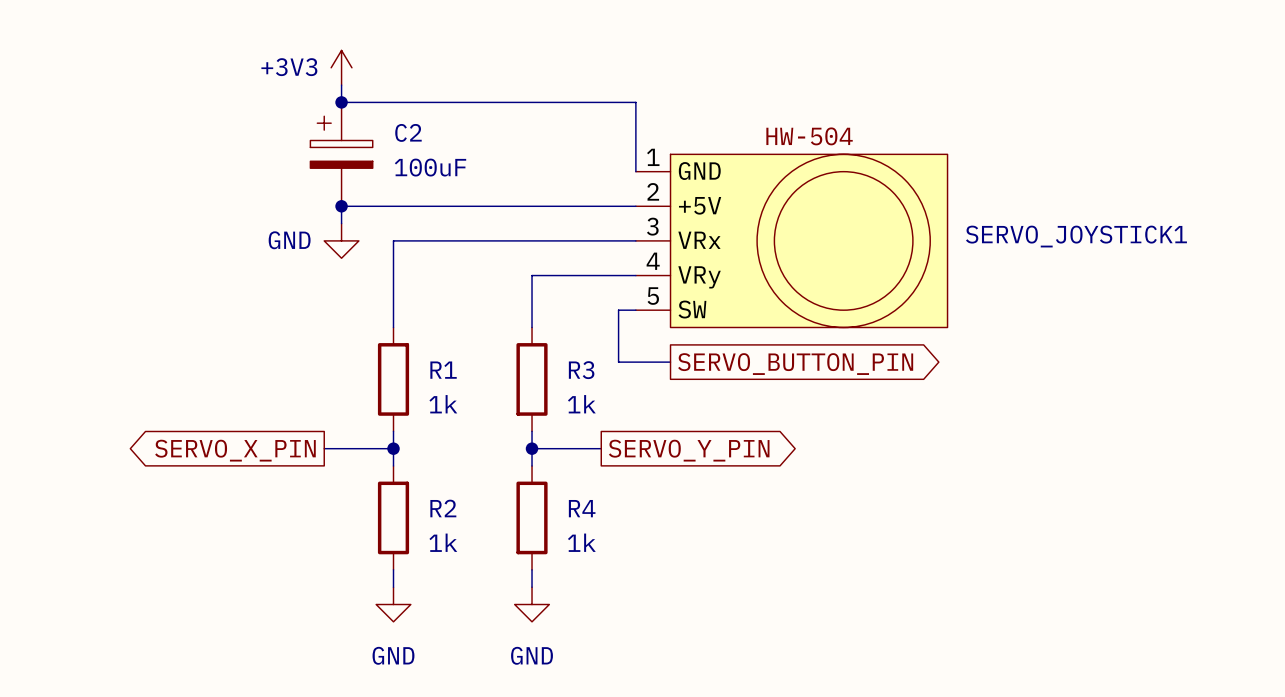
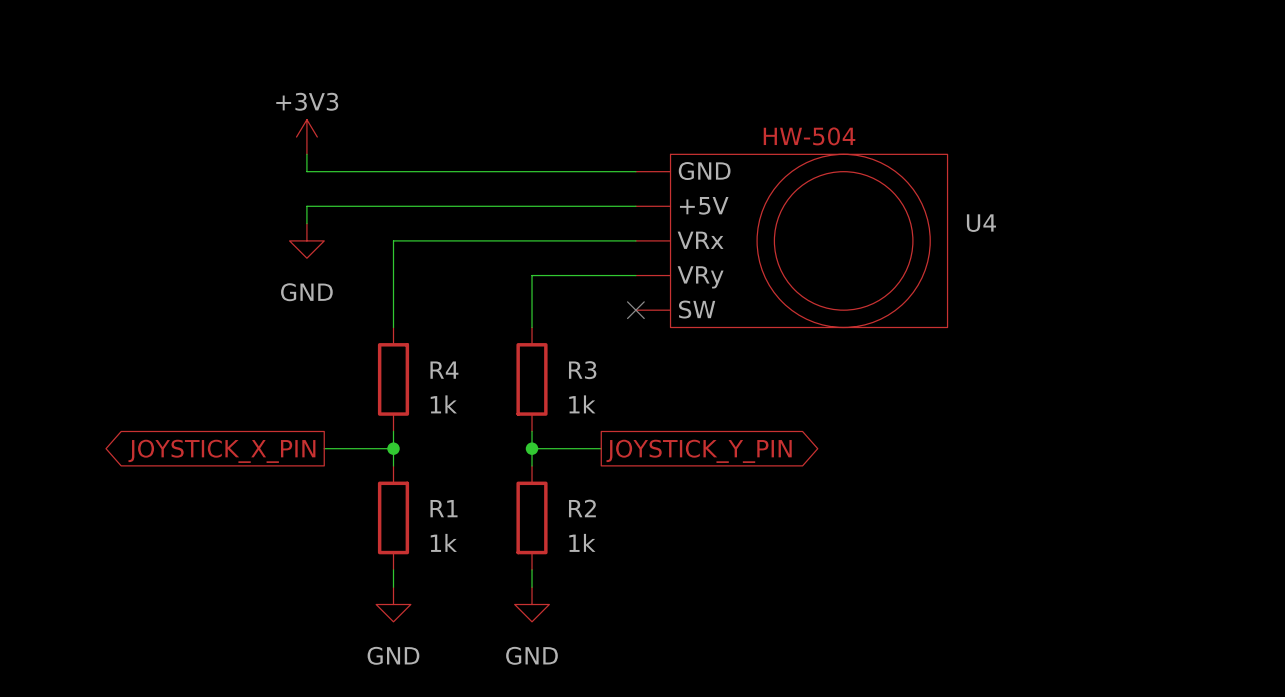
power symbol text position: +3V3 (289, 67) -> +3V3 (307, 101)
power symbol position: +3V3 (341, 67) -> +3V3 (306, 137)
wire: (341, 85) (341, 102) (635, 102) (635, 171) -> (306, 154) (306, 171) (635, 171)
junction: (341, 102) -> none
C2: 100uF (341, 154) -> none
SERVO_JOYSTICK1 pin number: 1 (653, 157) -> none
SERVO_JOYSTICK1 pin number: 2 (653, 191) -> none
wire: (341, 206) (341, 223) -> (341, 206) (306, 206) (306, 223)
junction: (341, 206) -> none
SERVO_JOYSTICK1 pin number: 3 (652, 226) -> none
SERVO_JOYSTICK1 name: SERVO_JOYSTICK1 (1076, 236) -> U4 (981, 223)
power symbol text position: GND (289, 240) -> GND (306, 292)
power symbol position: GND (341, 240) -> GND (306, 240)
SERVO_JOYSTICK1 pin number: 4 (653, 261) -> none
SERVO_JOYSTICK1 pin number: 5 (653, 296) -> none
wire: (635, 310) (618, 310) (618, 362) (670, 362) -> none
no-connect mark: none -> (635, 310)
global label: SERVO_BUTTON_PIN (795, 364) -> none
R1 name: R1 (443, 370) -> R4 (444, 370)
global label: SERVO_X_PIN (235, 450) -> JOYSTICK_X_PIN (221, 451)
global label: SERVO_Y_PIN (689, 450) -> JOYSTICK_Y_PIN (699, 451)
R2 name: R2 (443, 508) -> R1 (444, 508)
R4 name: R4 (582, 508) -> R2 (582, 508)

